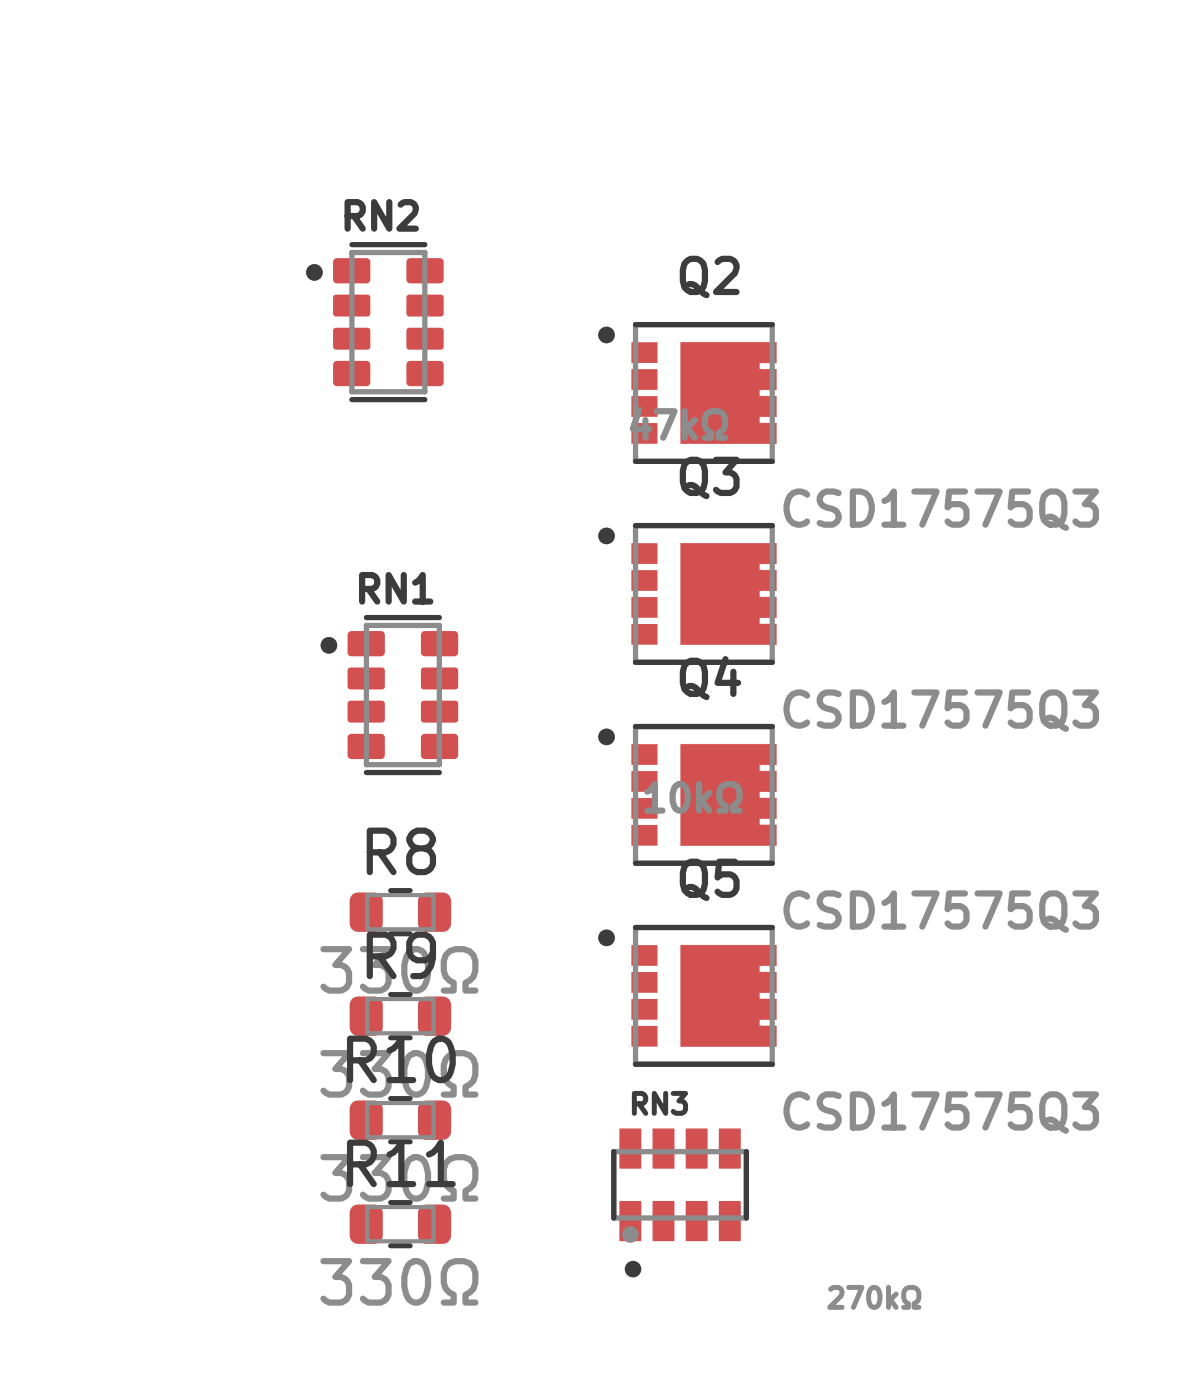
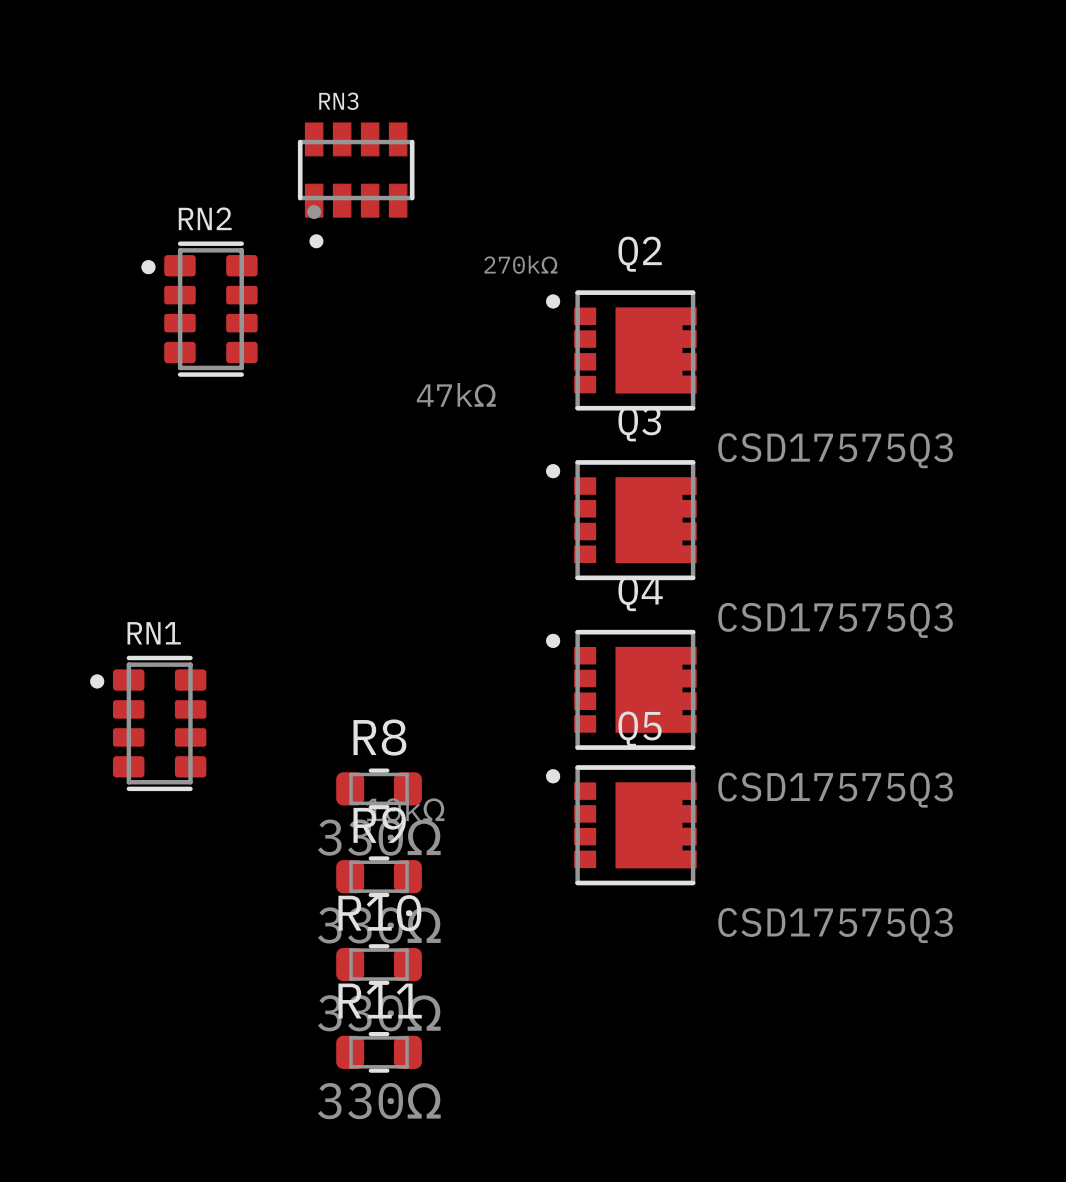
RN2 position: (374, 322) -> (199, 309)
RN1 position: (389, 695) -> (148, 723)
Q5 position: (687, 995) -> (621, 825)
RN3 position: (680, 1202) -> (356, 185)

